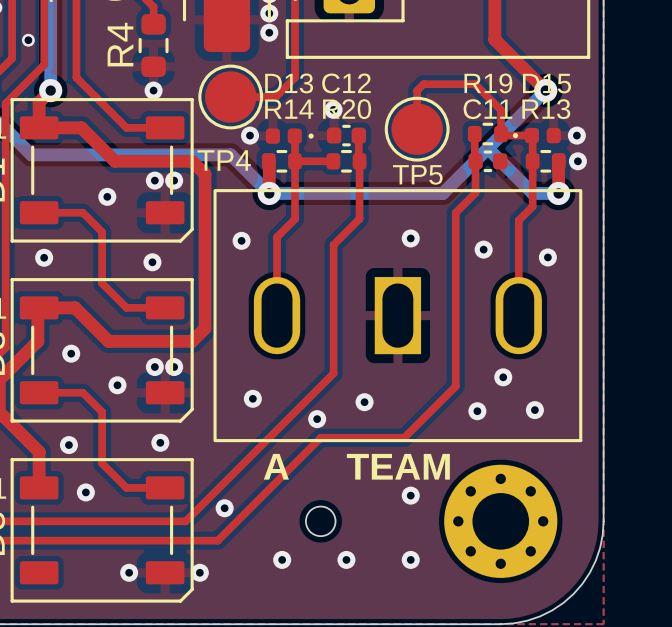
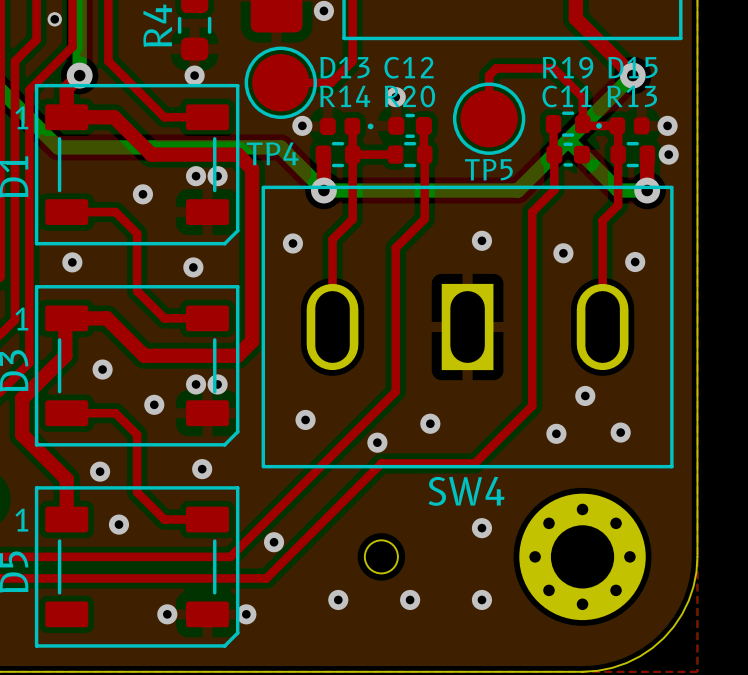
SW4 name: none -> SW4 (466, 491)
text: A (276, 466) -> none
text: TEAM (398, 466) -> none

